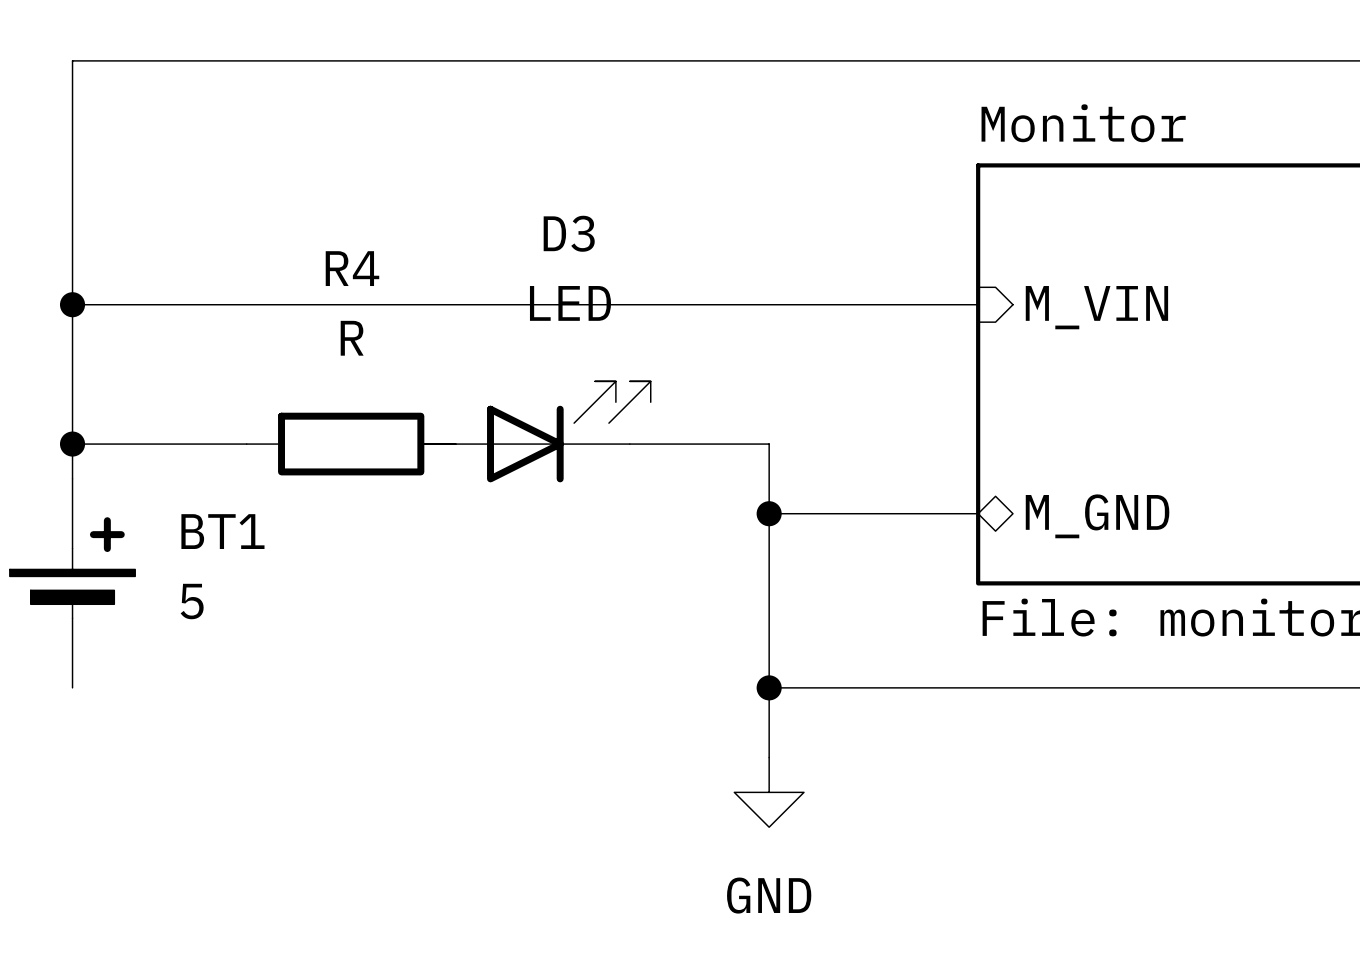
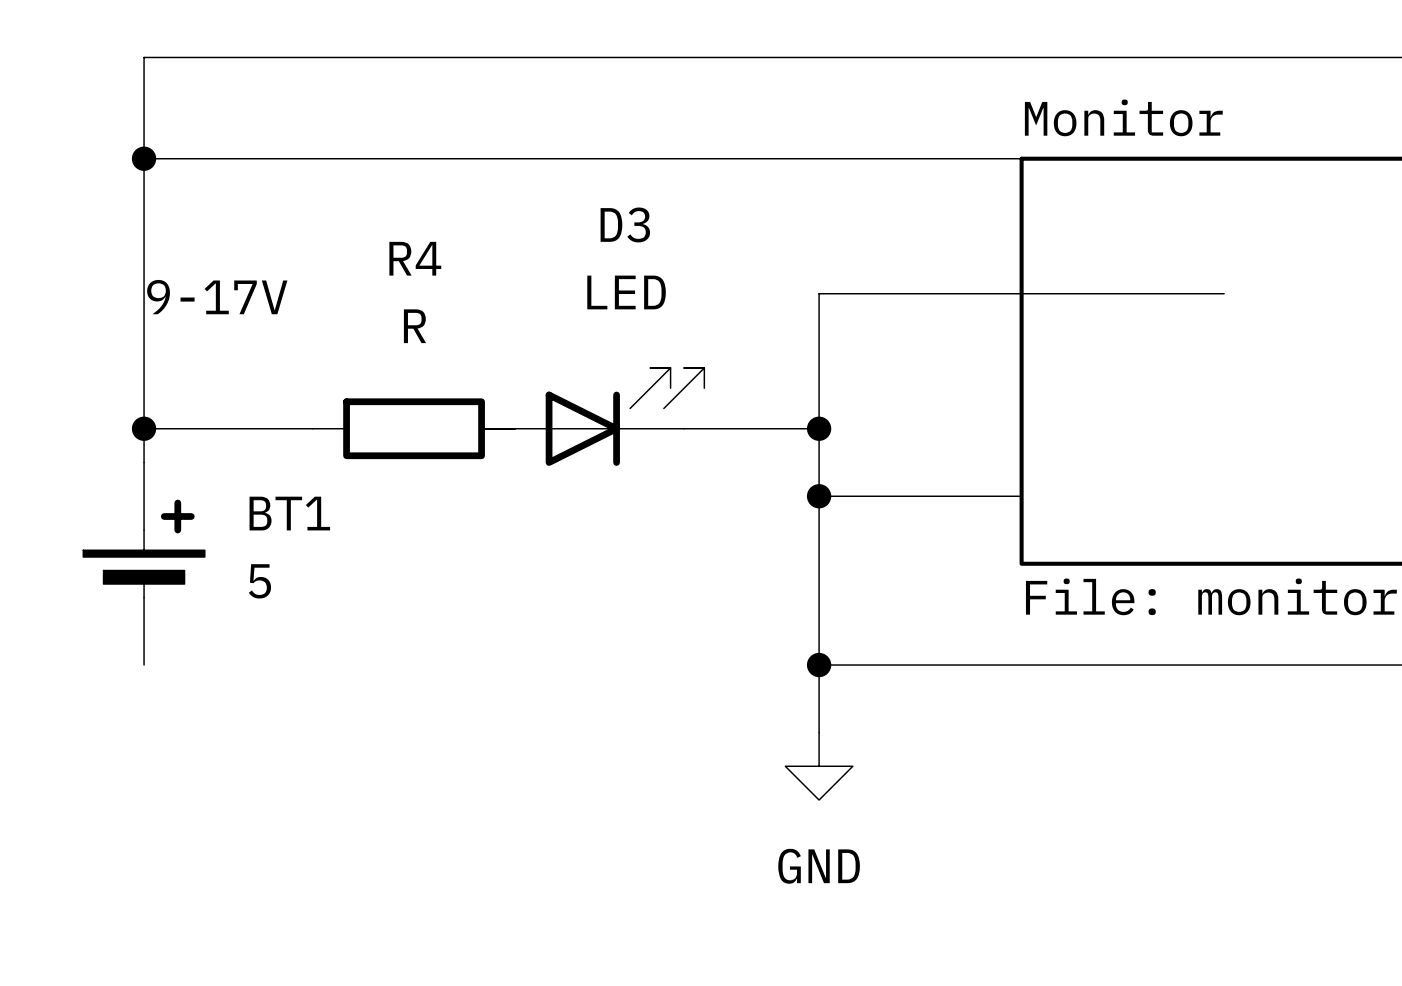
wire: none -> (144, 158) (1224, 158)
wire: (72, 304) (769, 304) -> (819, 428) (819, 293)
junction position: (72, 304) -> (144, 158)
wire: none -> (1021, 293) (1224, 293)
sheet pin: M_VIN (1096, 307) -> none
label: none -> 9-17V (217, 297)
junction: none -> (819, 428)
sheet pin: M_GND (1097, 516) -> none

